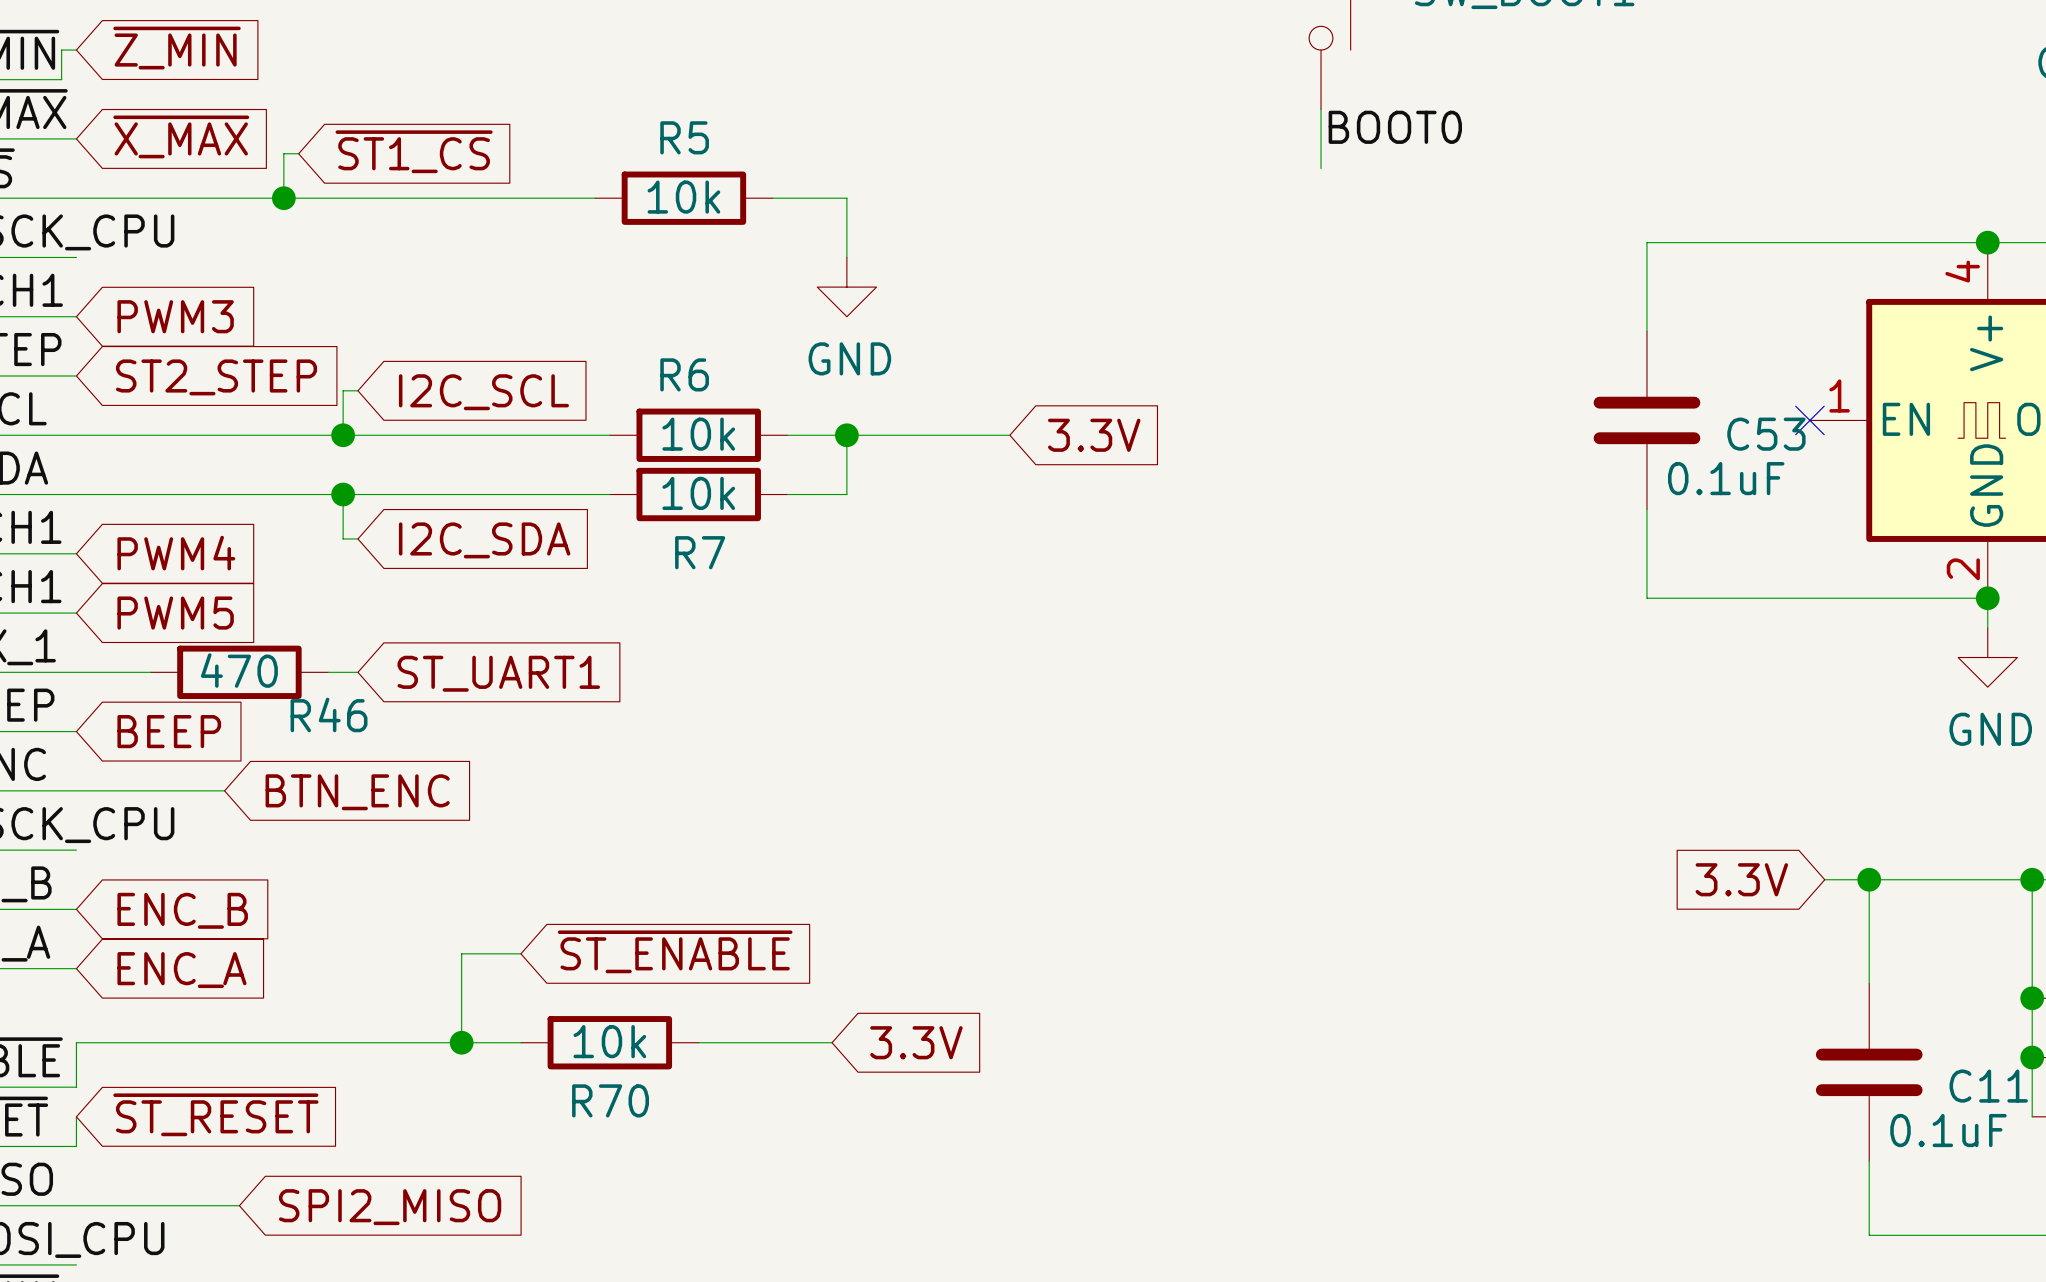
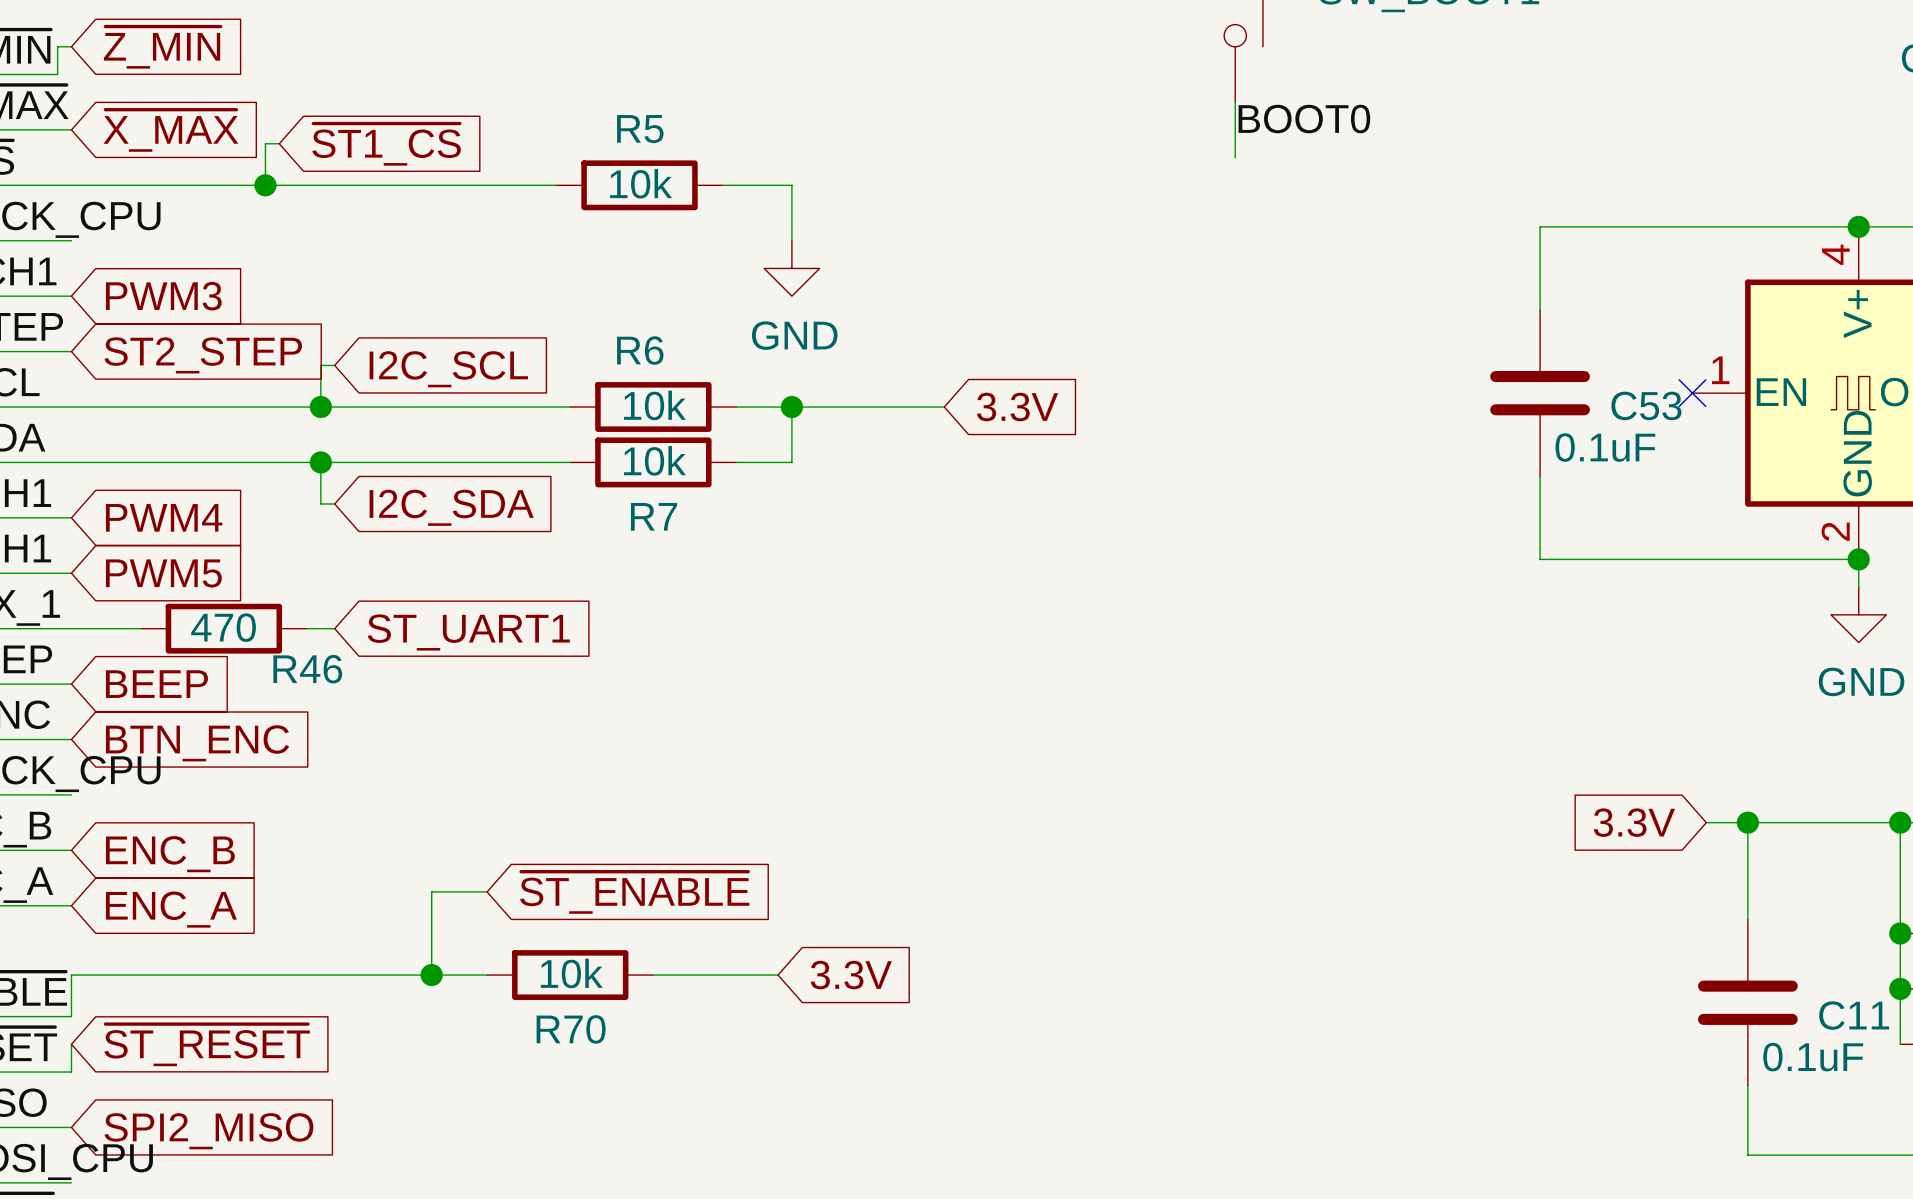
wire: (76, 790) (224, 790) -> none
global label position: BTN_ENC (357, 792) -> BTN_ENC (197, 743)
wire: (76, 1205) (239, 1205) -> none
global label position: SPI2_MISO (390, 1207) -> SPI2_MISO (208, 1131)

